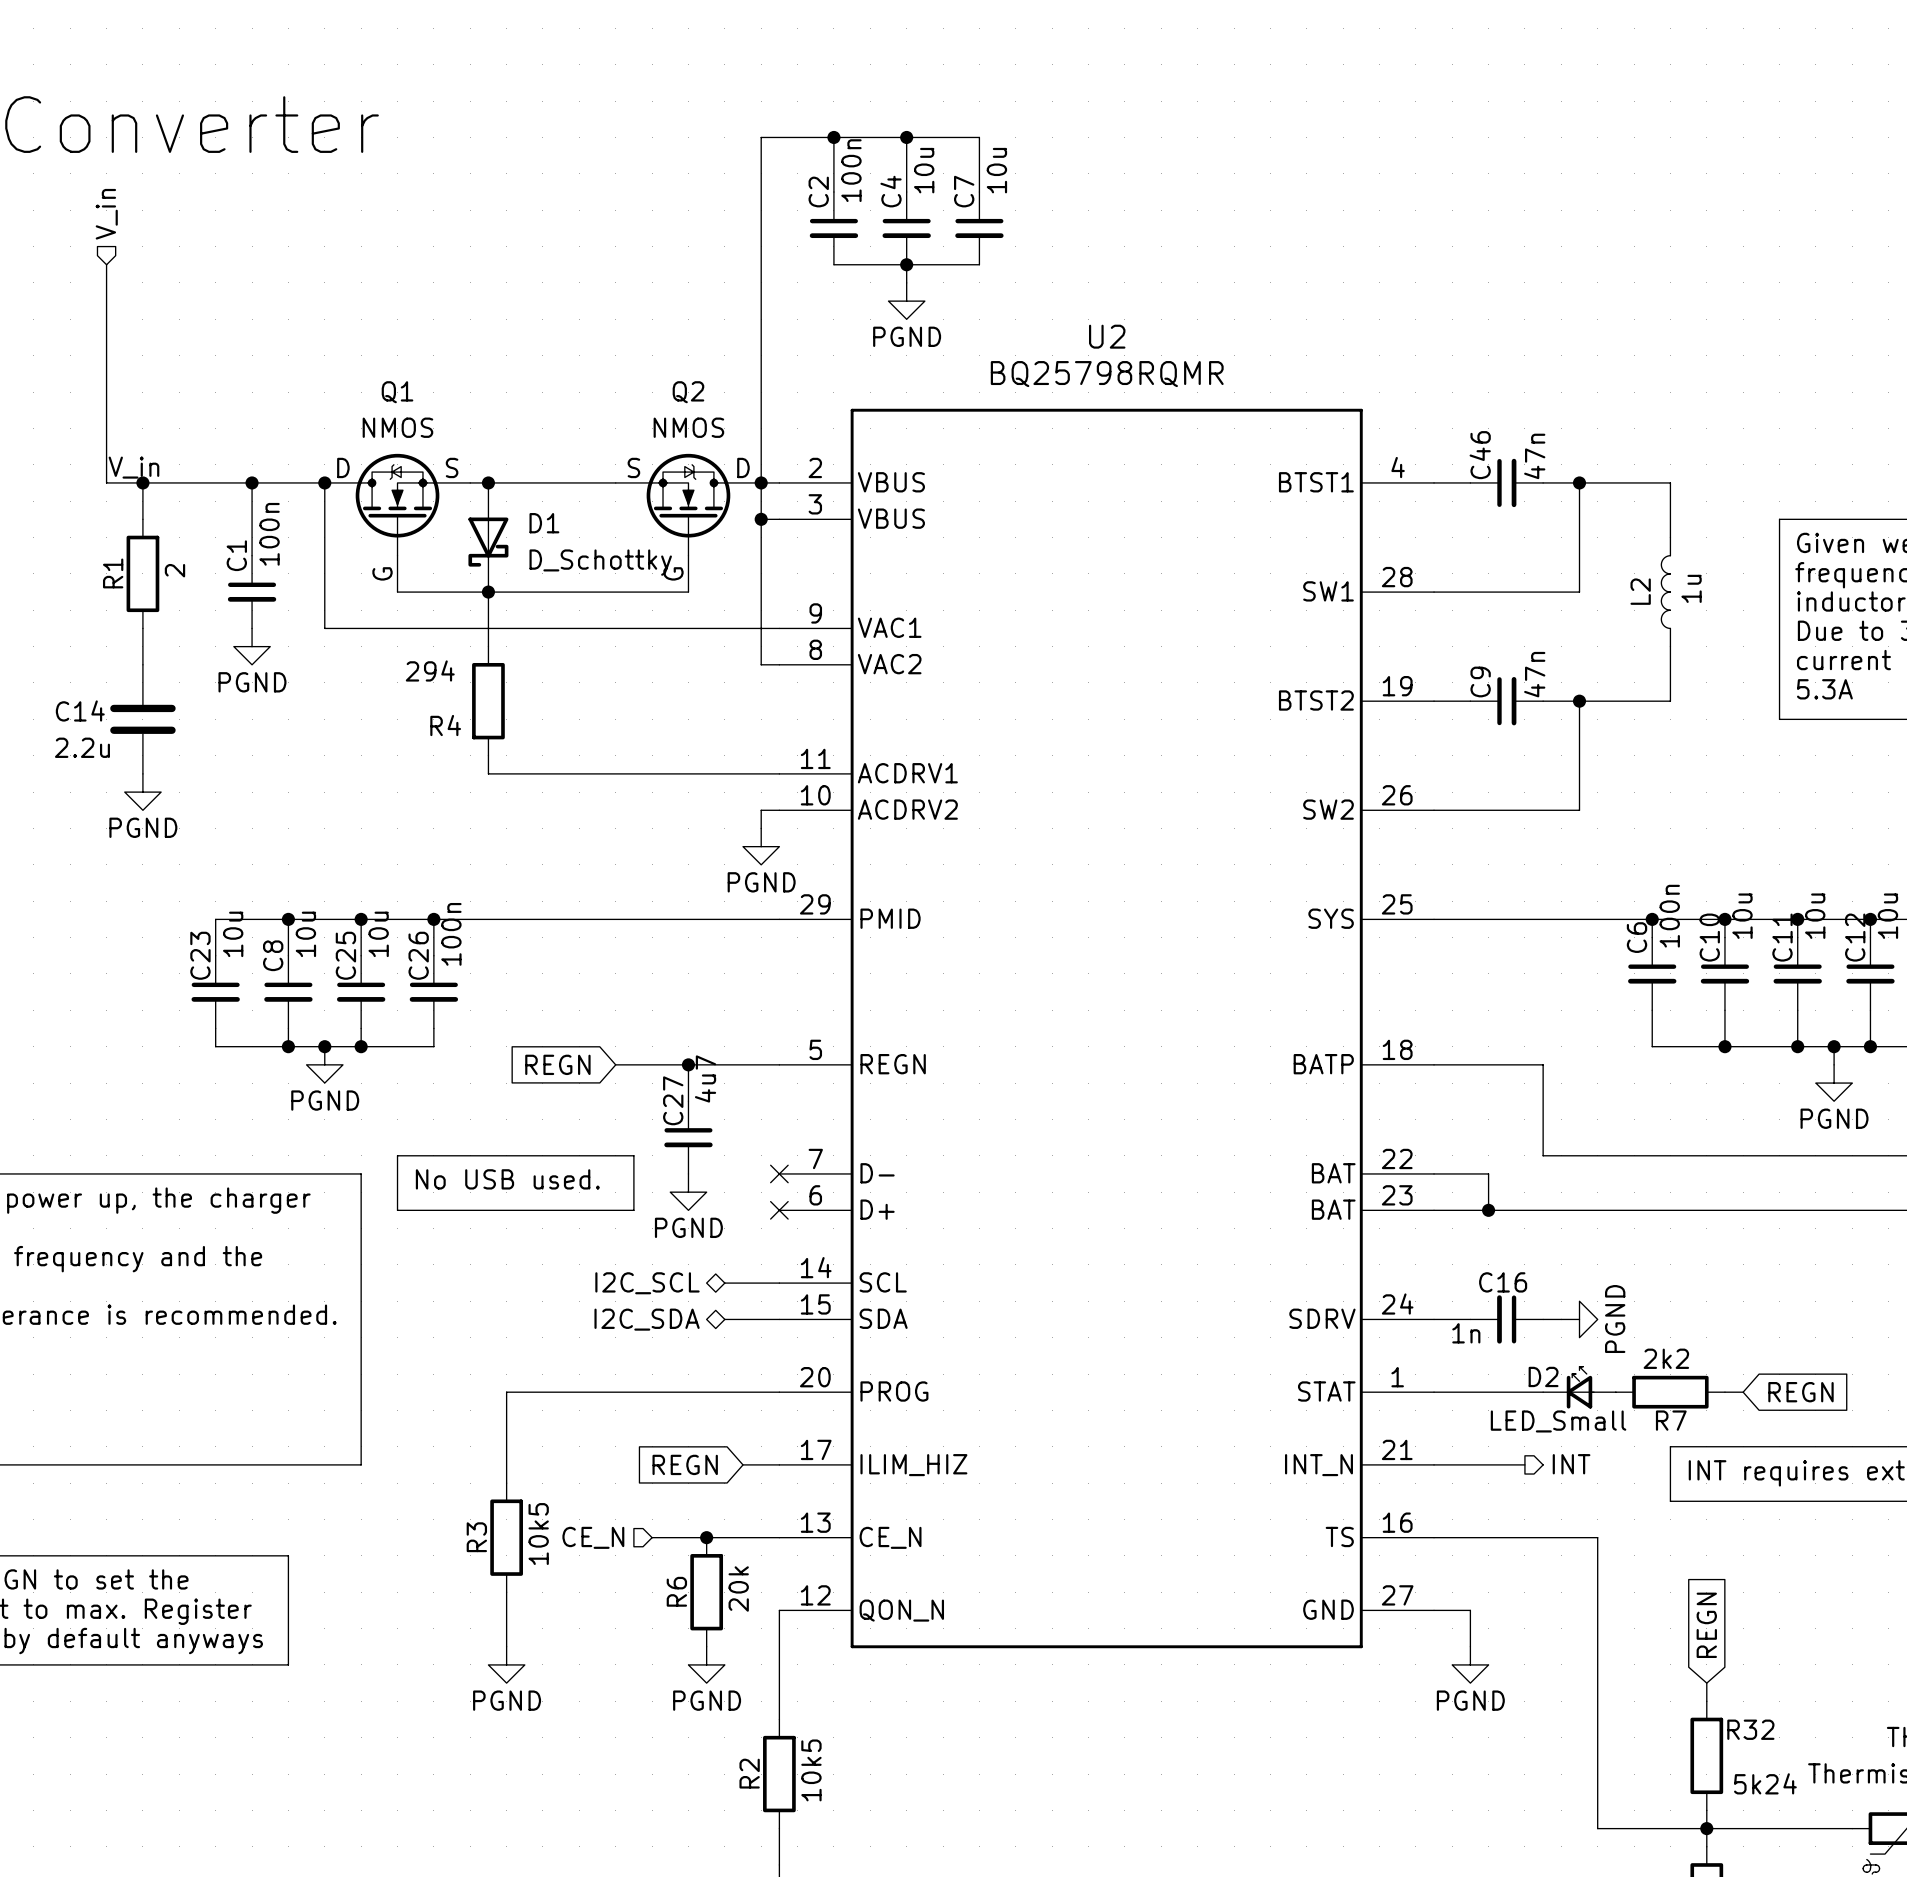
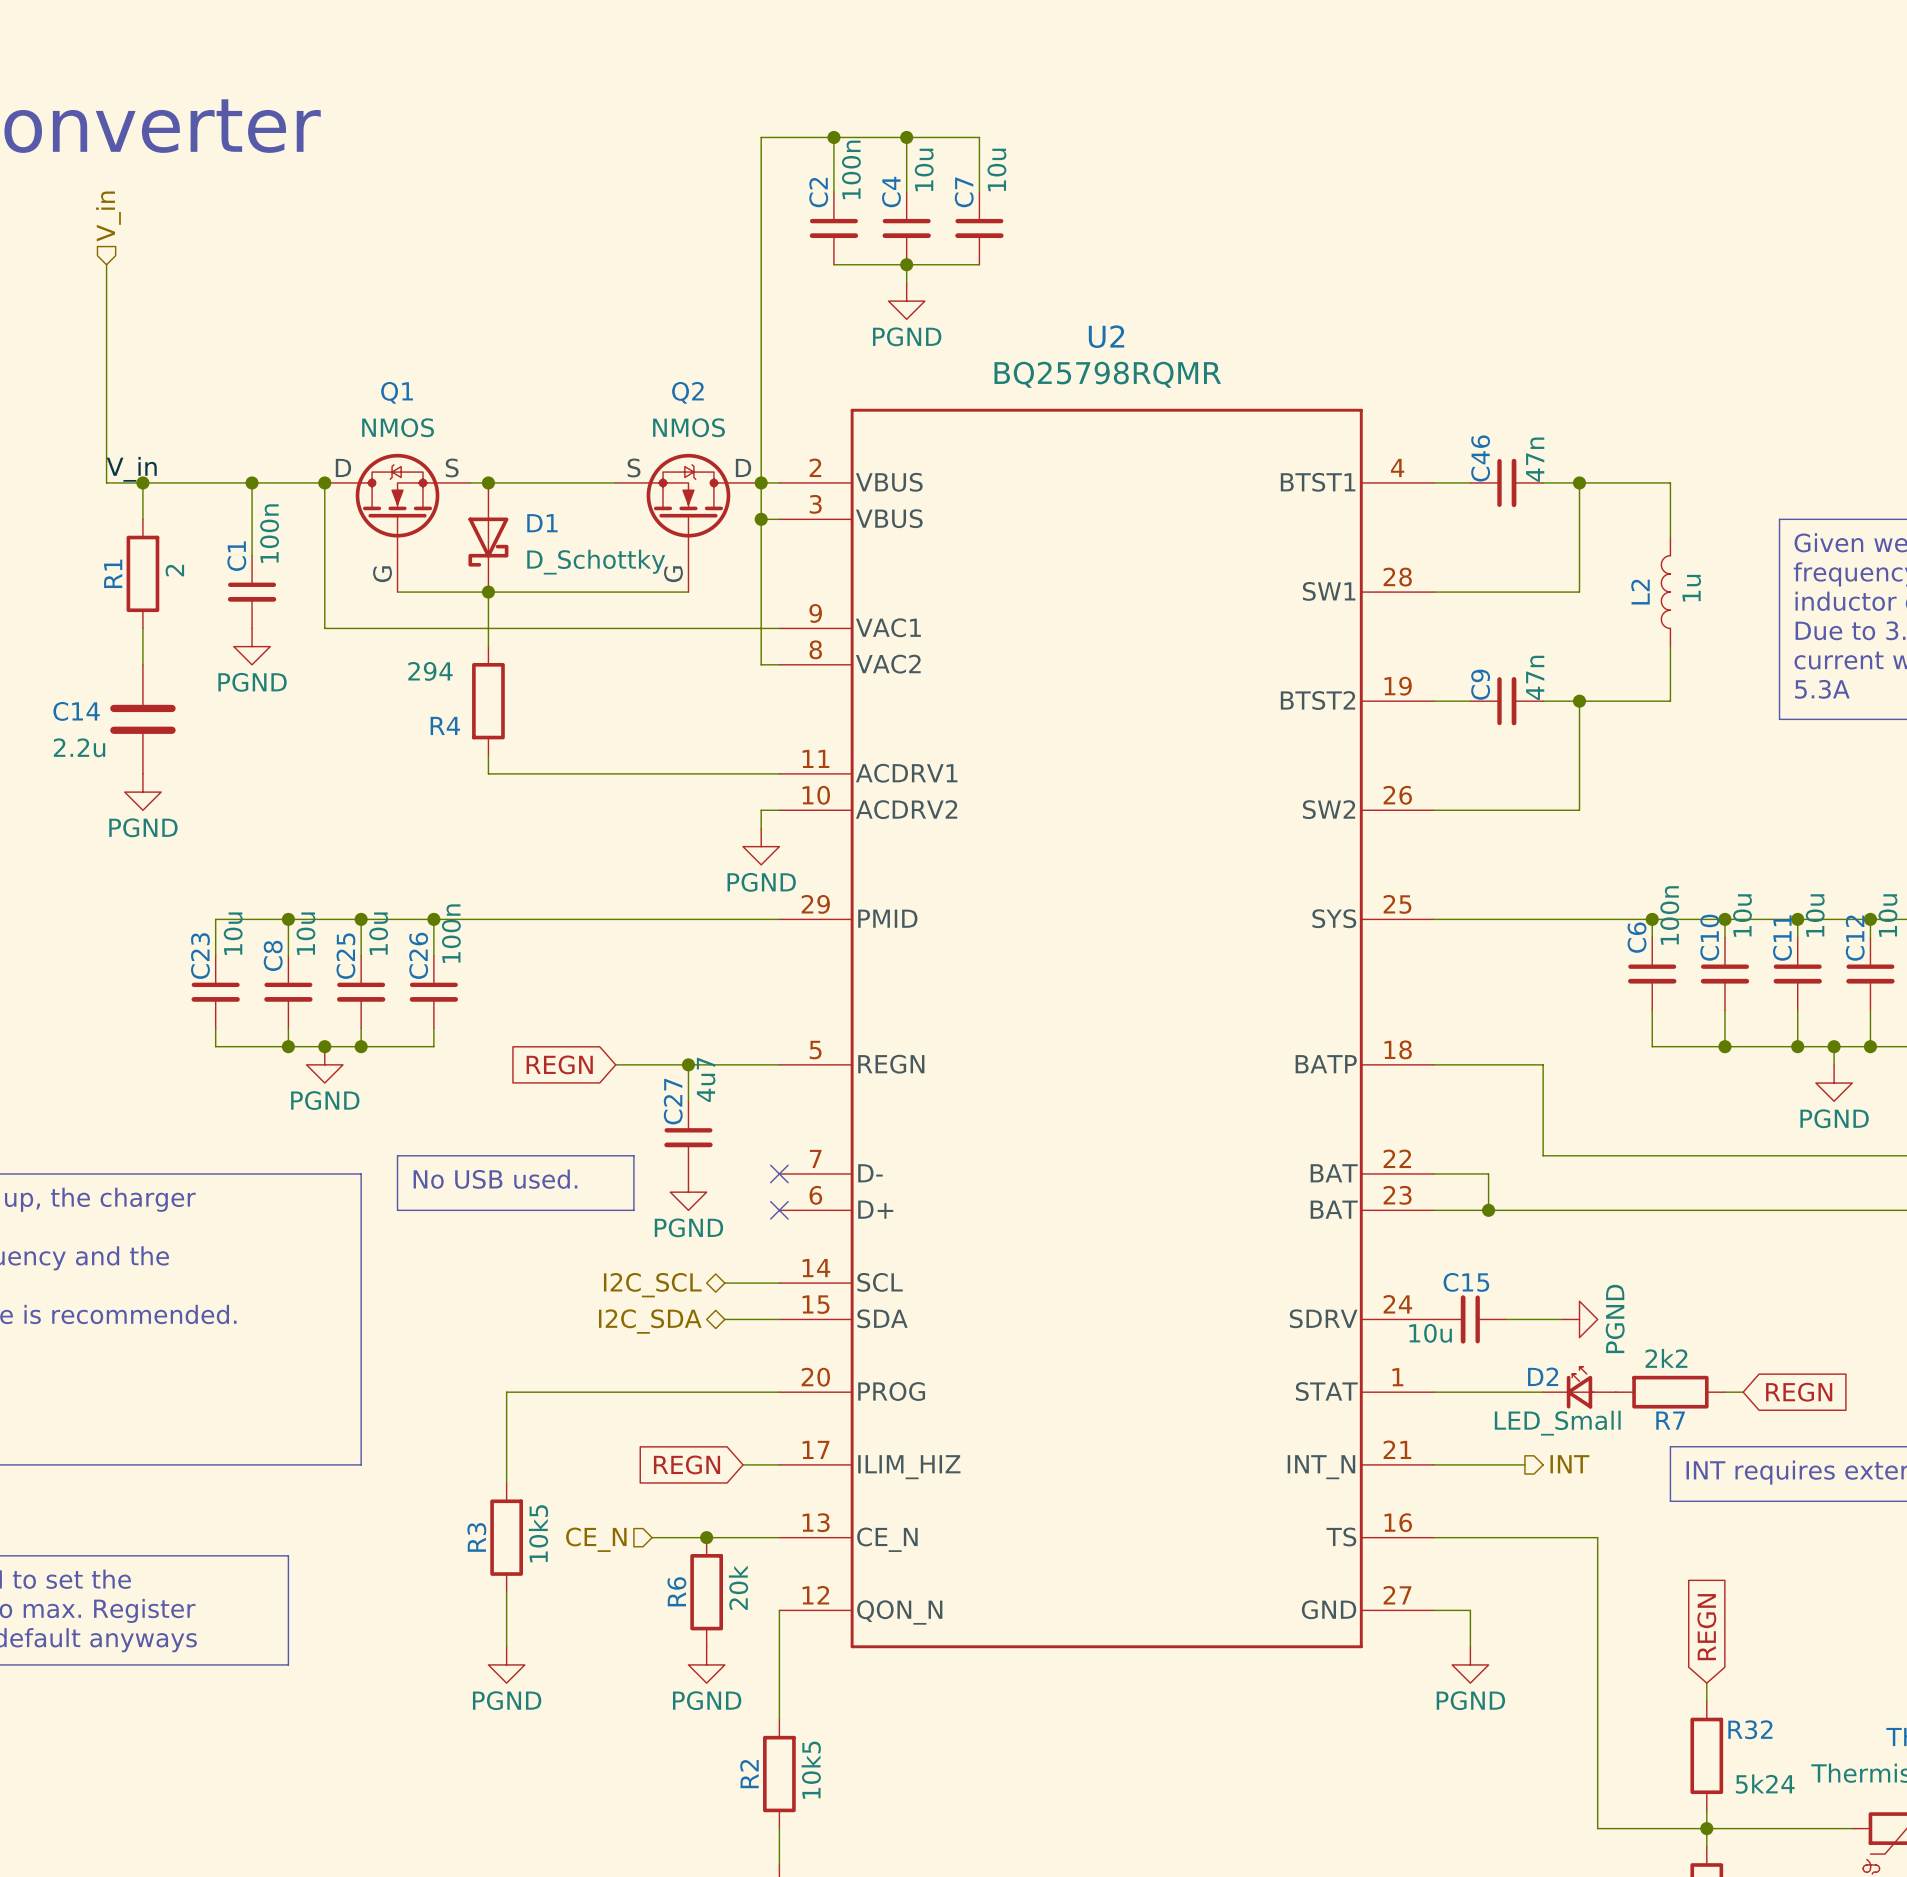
C15: none -> 10u (1470, 1319)
C16: 1n (1506, 1319) -> none

